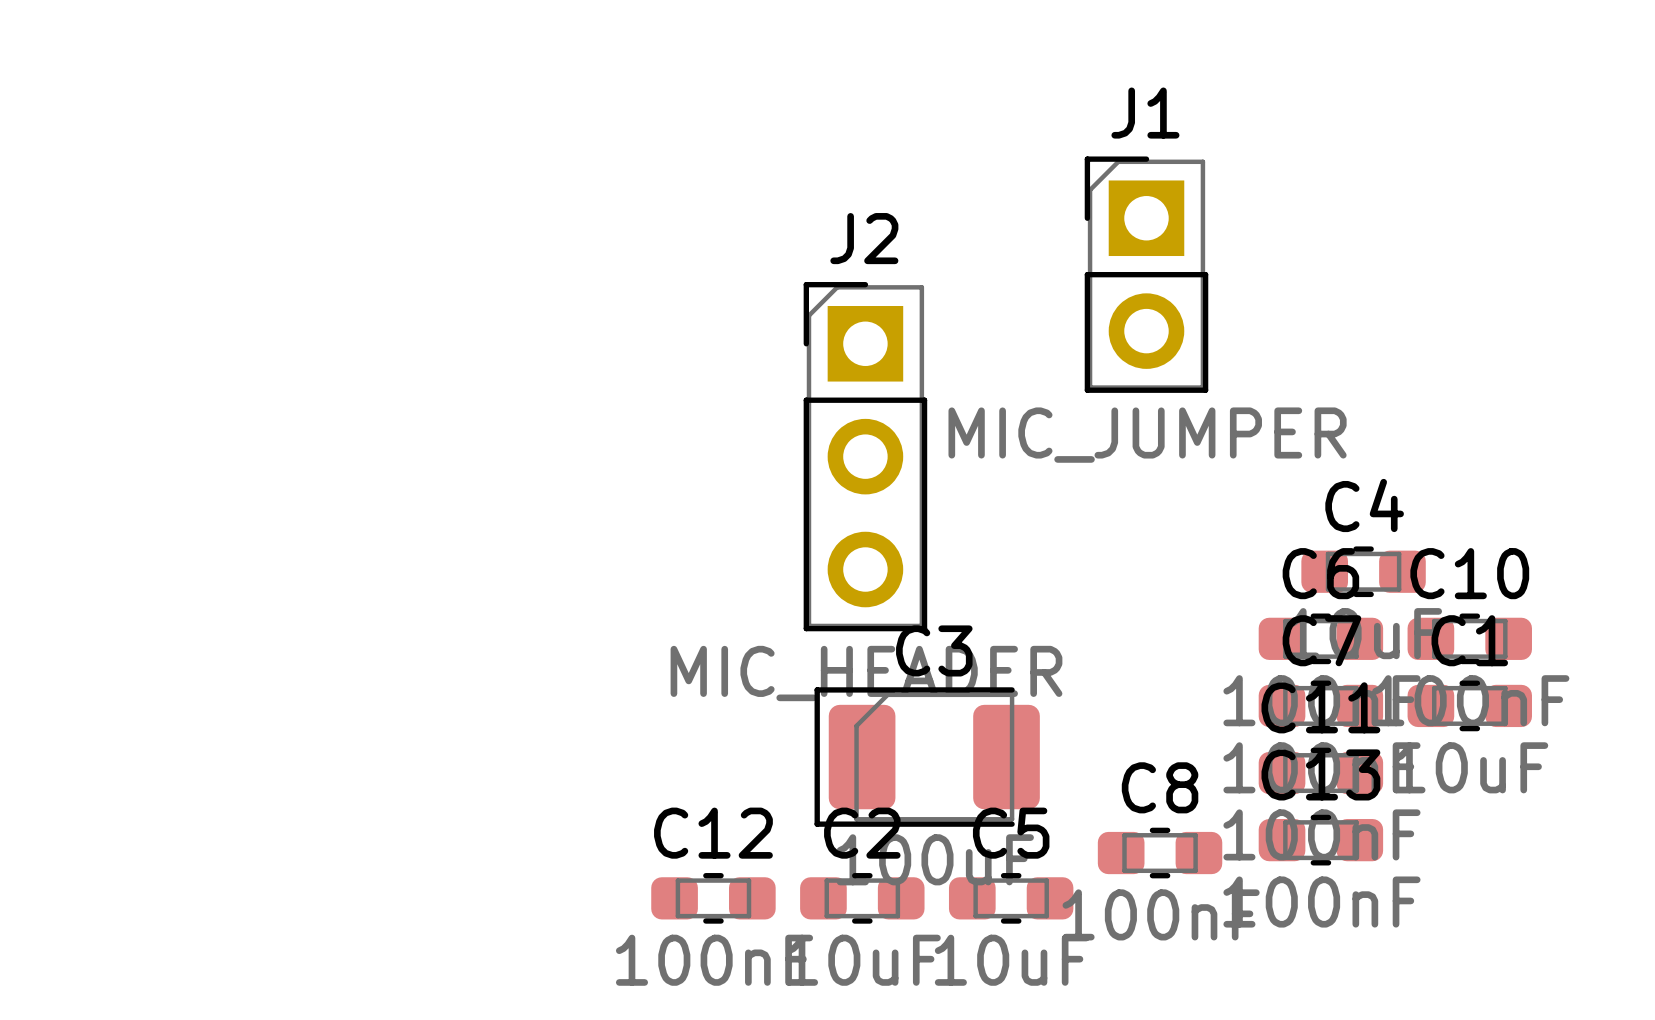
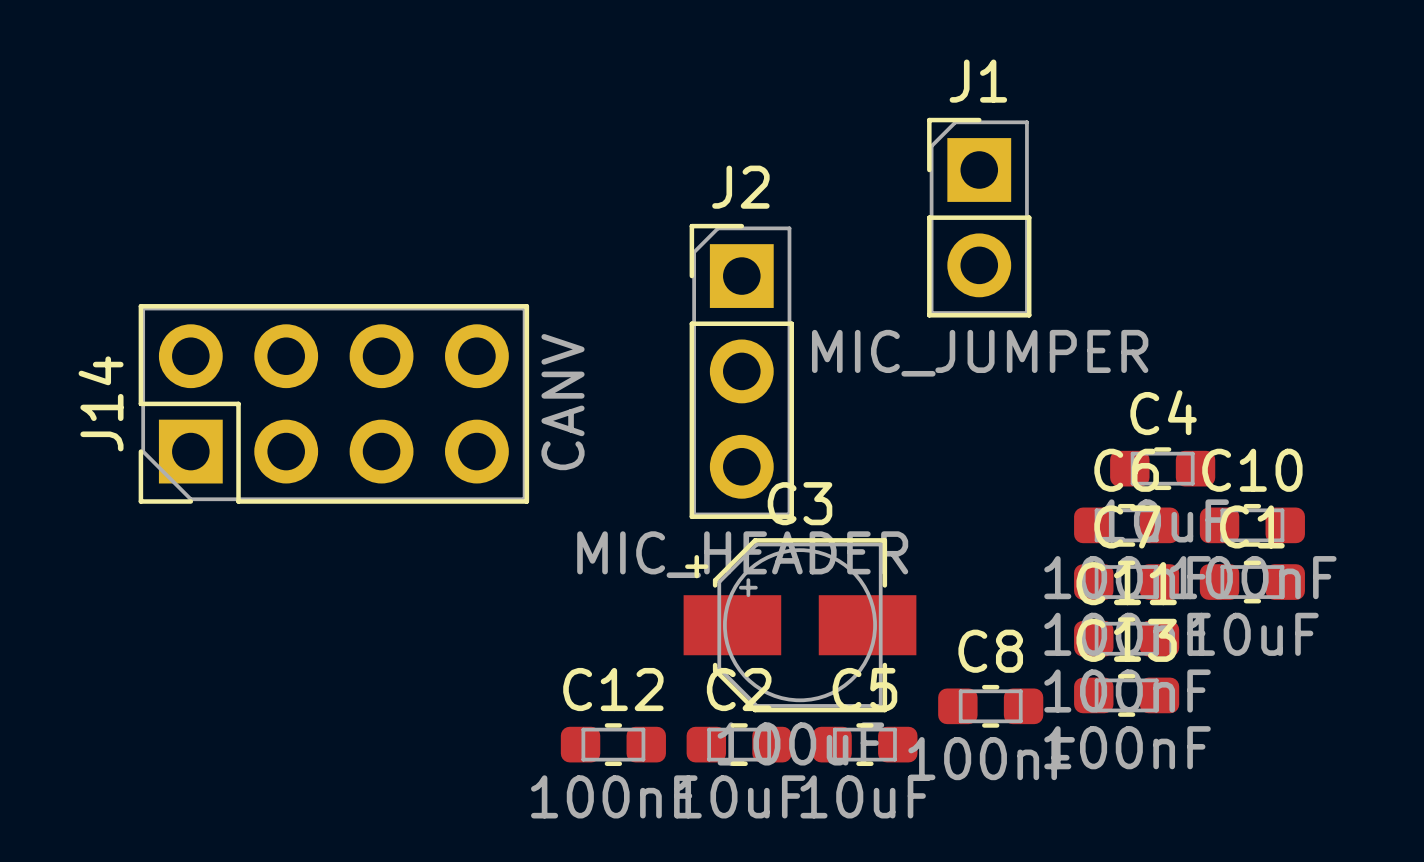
J14: none -> CANV (333, 403)
C3 footprint: [814, 687, 1040, 827] -> [683, 538, 917, 713]

